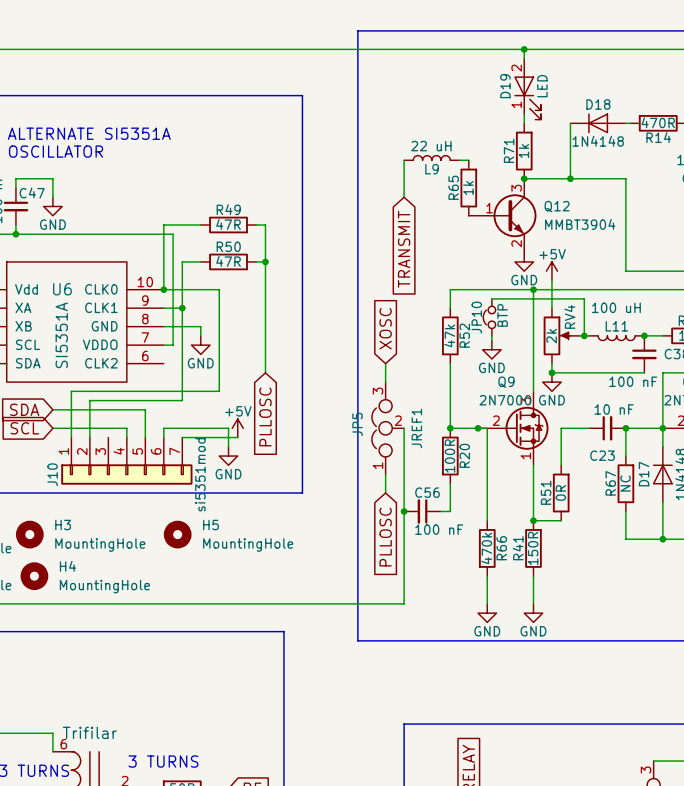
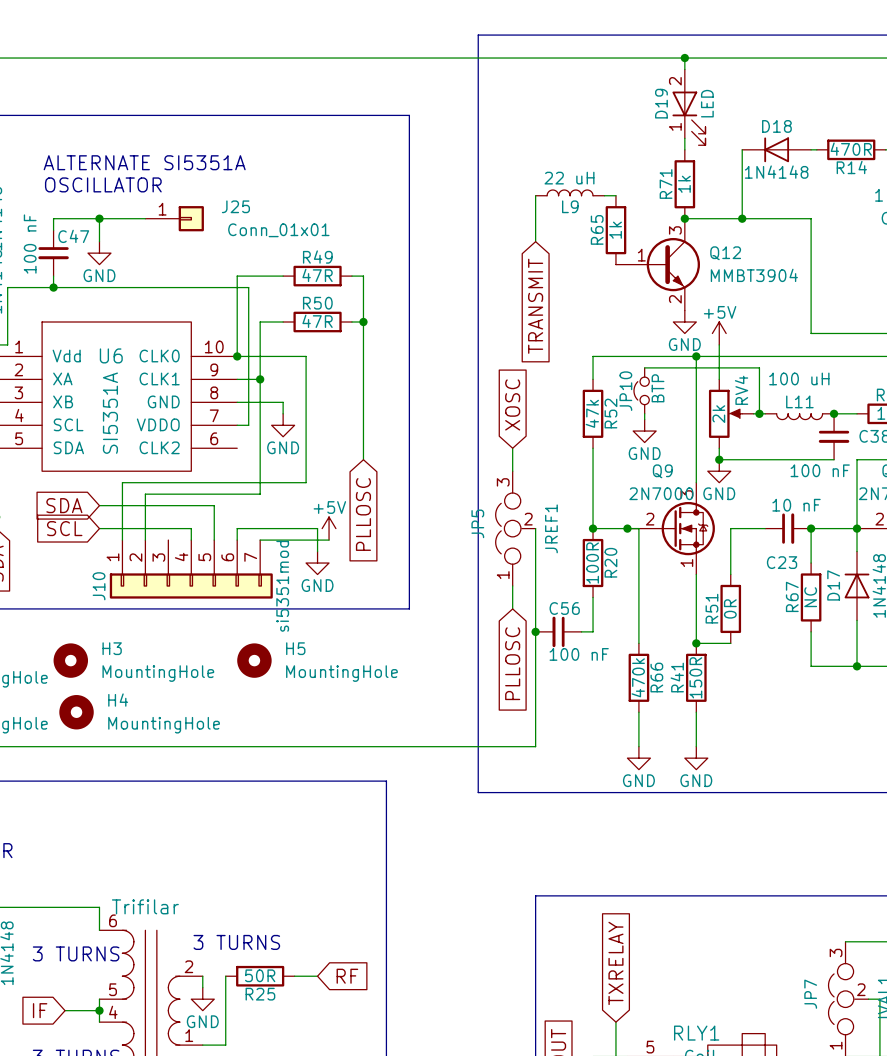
wire: none -> (99, 218) (145, 218)
junction: none -> (99, 218)
J25: none -> Conn_01x01 (174, 218)

